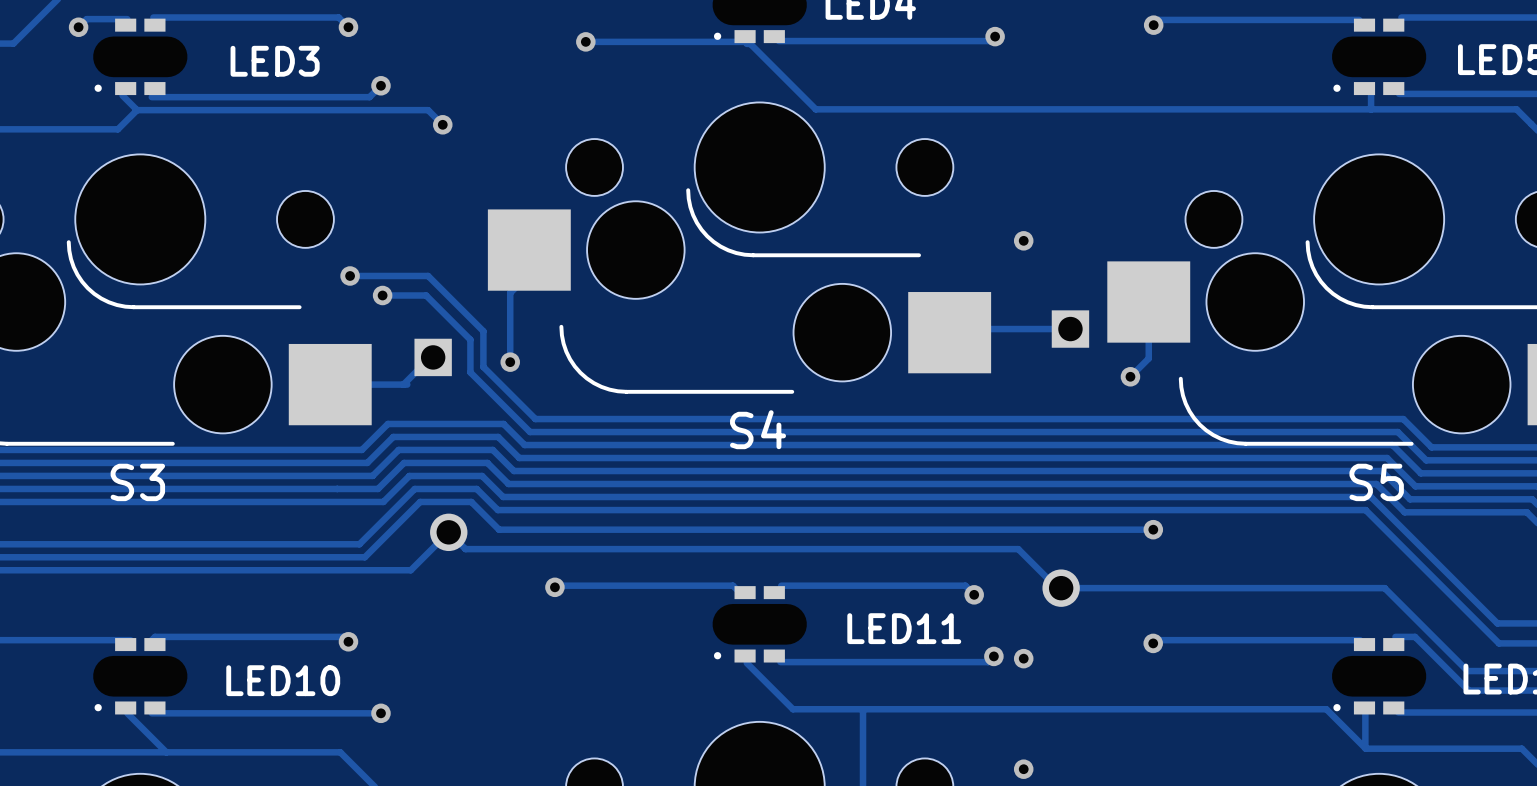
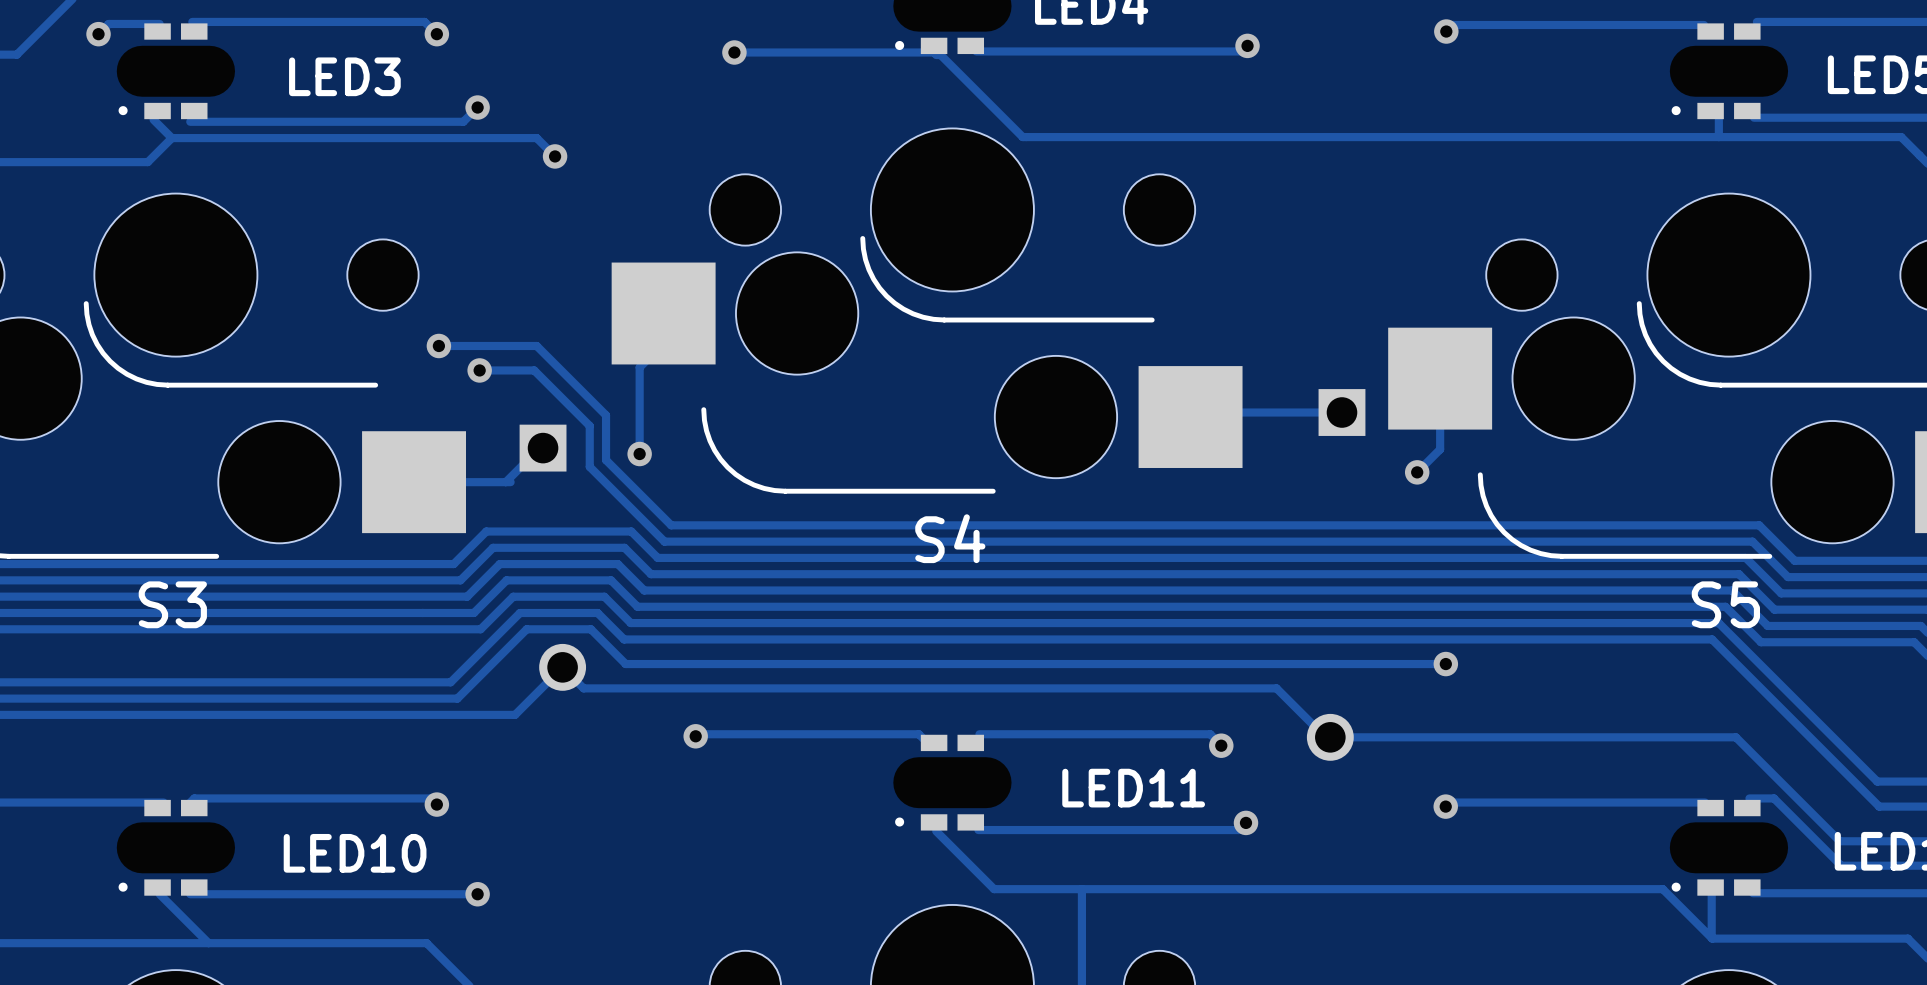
via: (1023, 240) -> none
via: (1023, 658) -> none
via: (1023, 769) -> none

